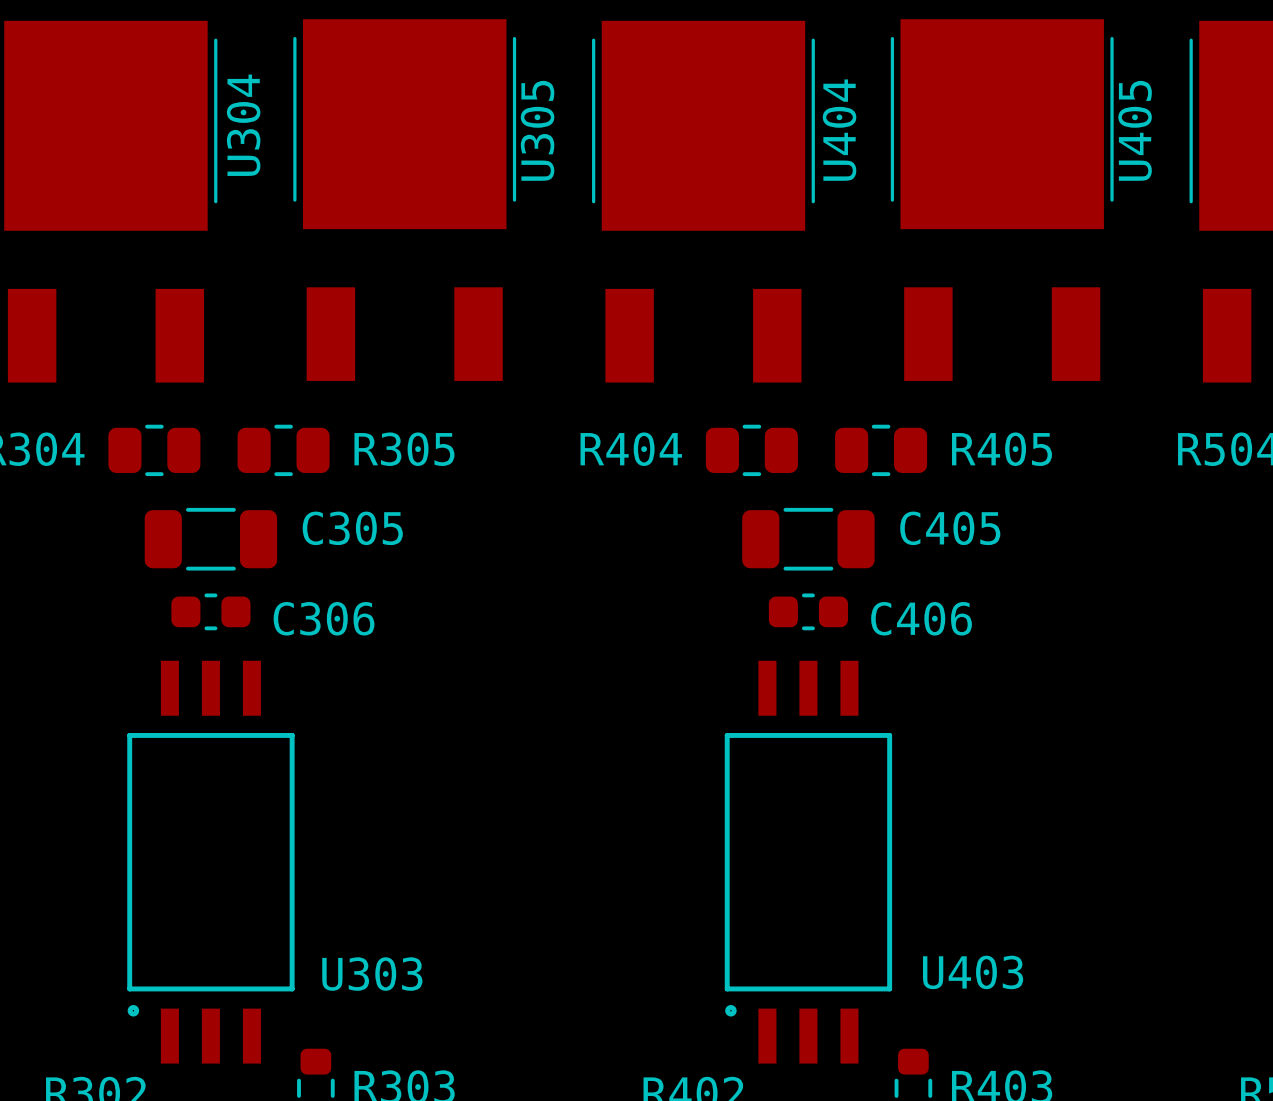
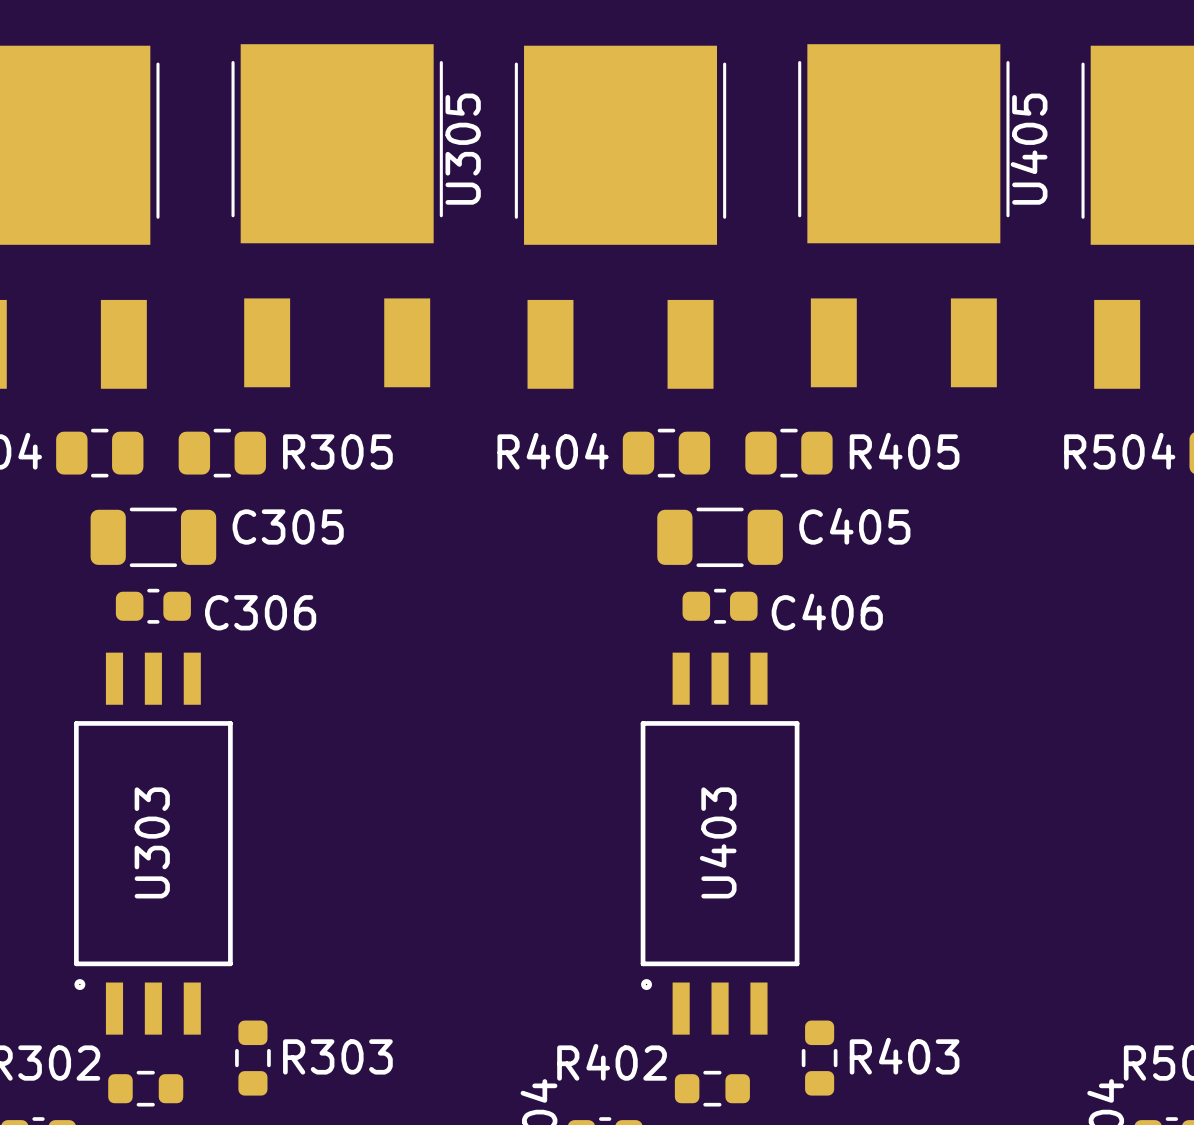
U304 name: U304 (243, 125) -> none
U404 name: U404 (839, 130) -> none
U403 name rotation: 0° (973, 972) -> 90° counterclockwise (718, 842)
U403 name position: U403 (973, 972) -> U403 (718, 842)
U303 name rotation: 0° (372, 974) -> 90° counterclockwise (152, 842)
U303 name position: U303 (372, 974) -> U303 (152, 842)

